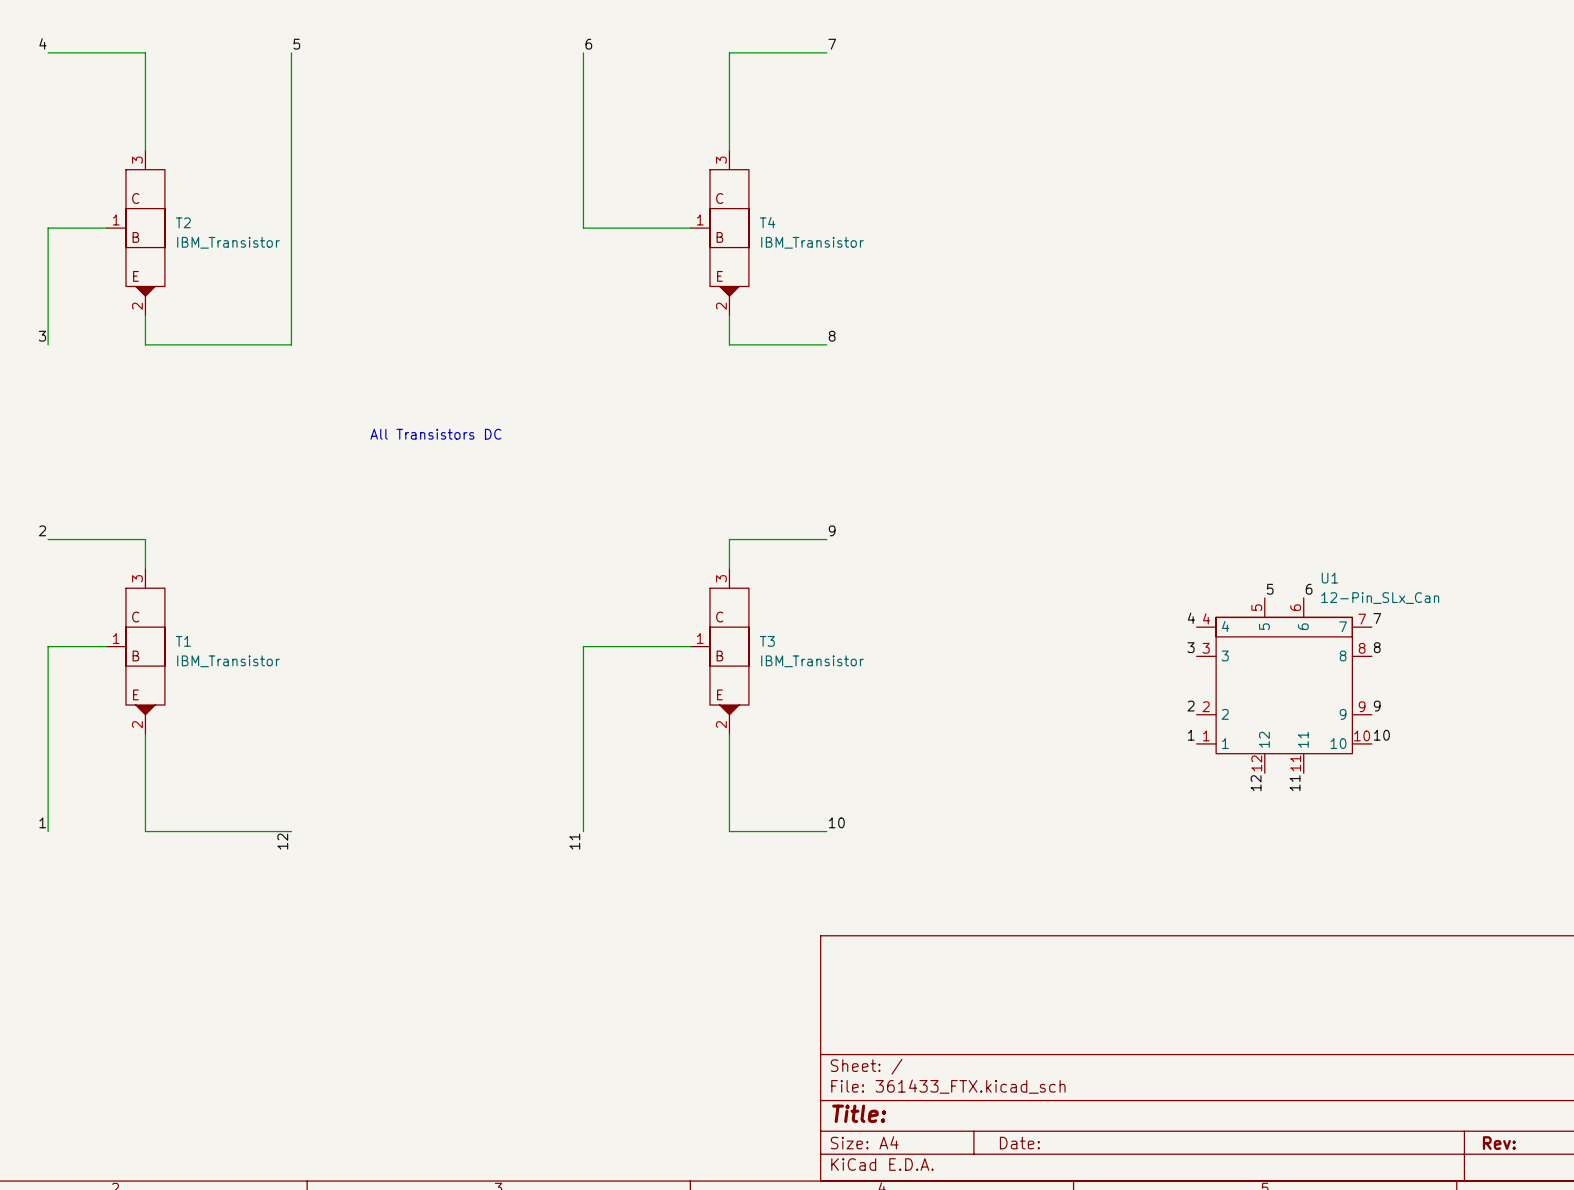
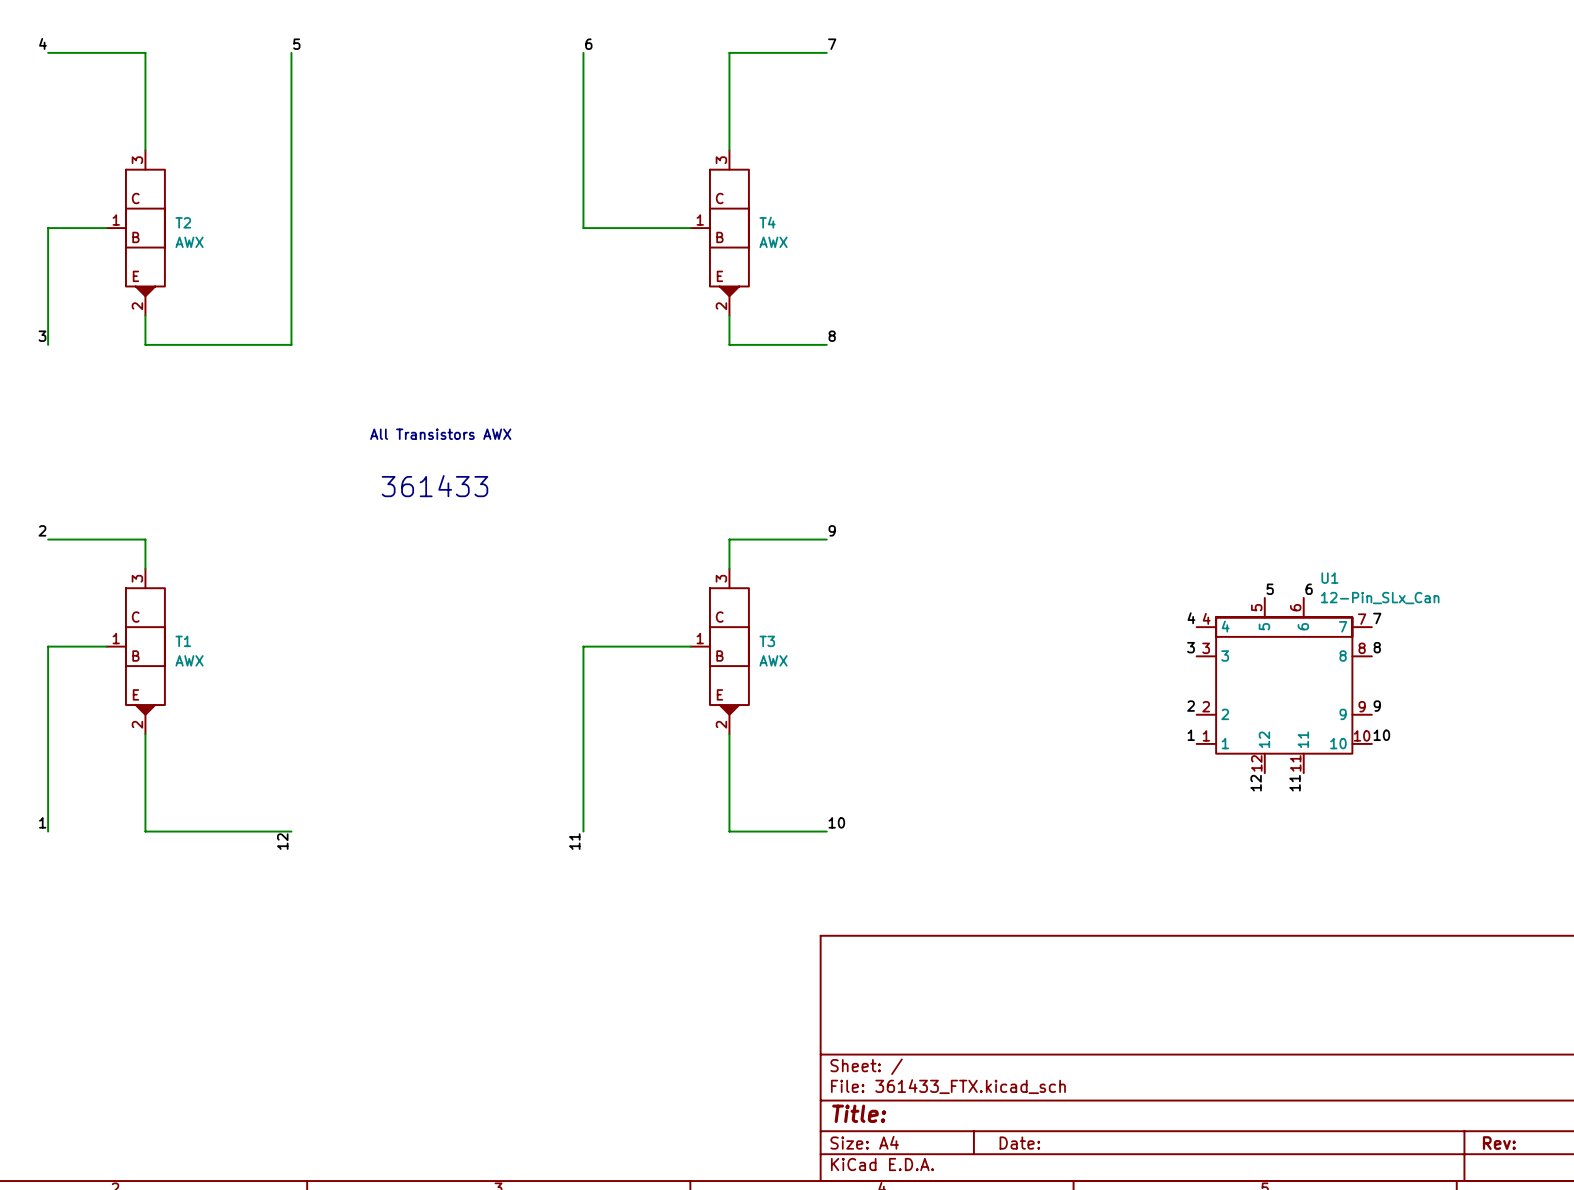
T2 value: IBM_Transistor (228, 242) -> AWX (189, 242)
T4 value: IBM_Transistor (812, 242) -> AWX (773, 242)
text: All Transistors DC (435, 434) -> All Transistors AWX (440, 434)
text: none -> 361433 (434, 486)
T1 value: IBM_Transistor (228, 661) -> AWX (189, 660)
T3 value: IBM_Transistor (812, 661) -> AWX (773, 660)

